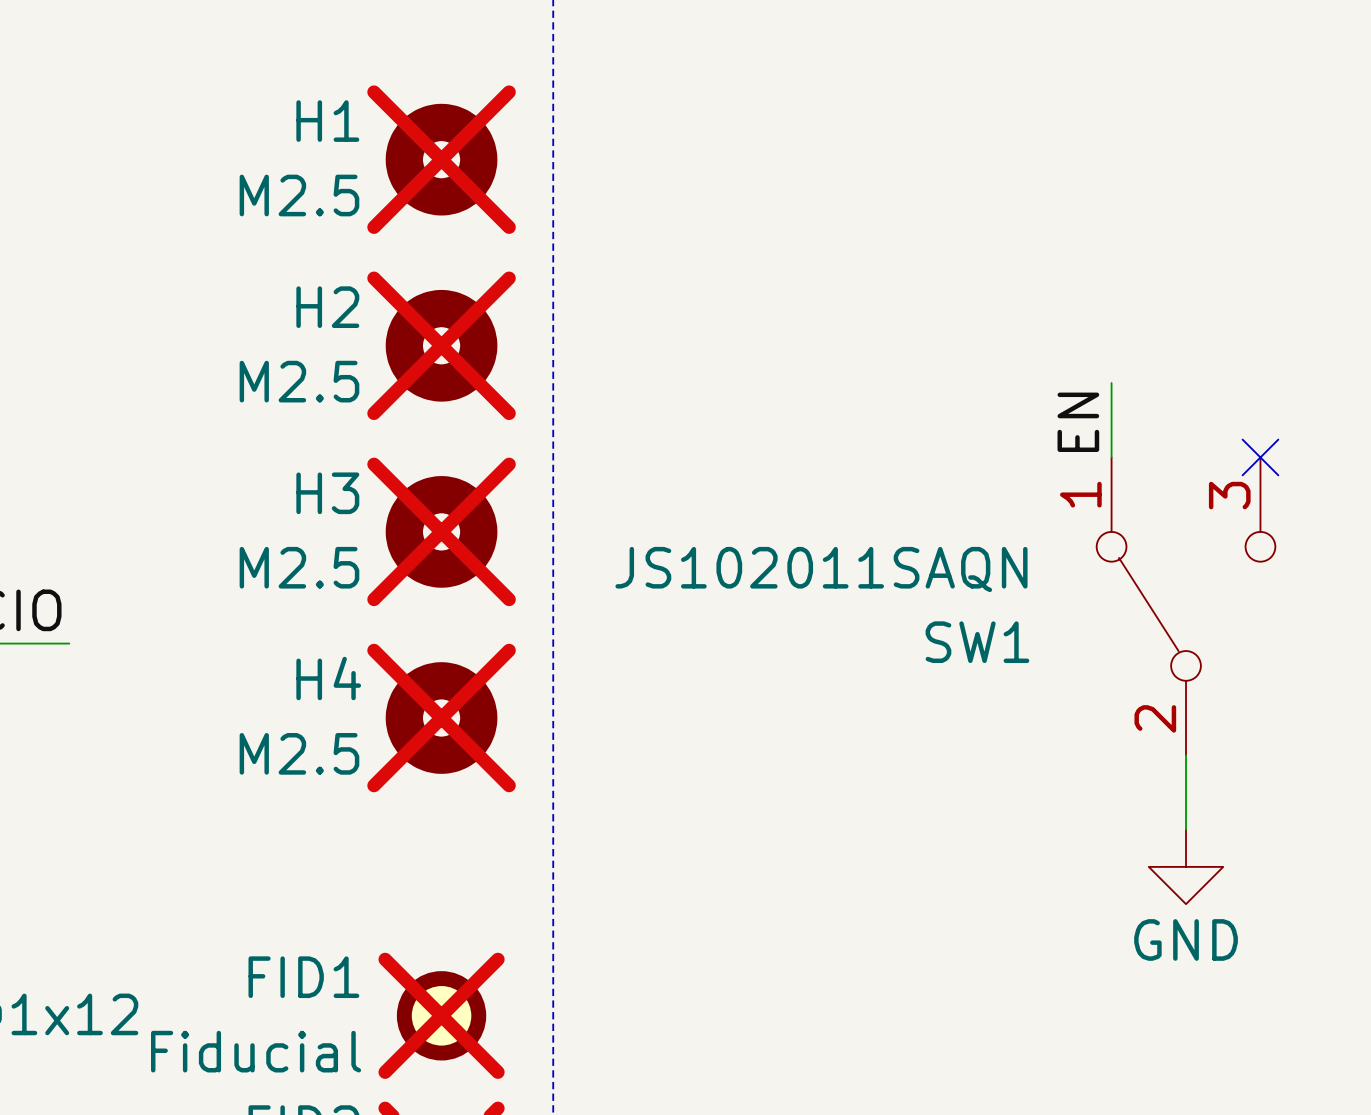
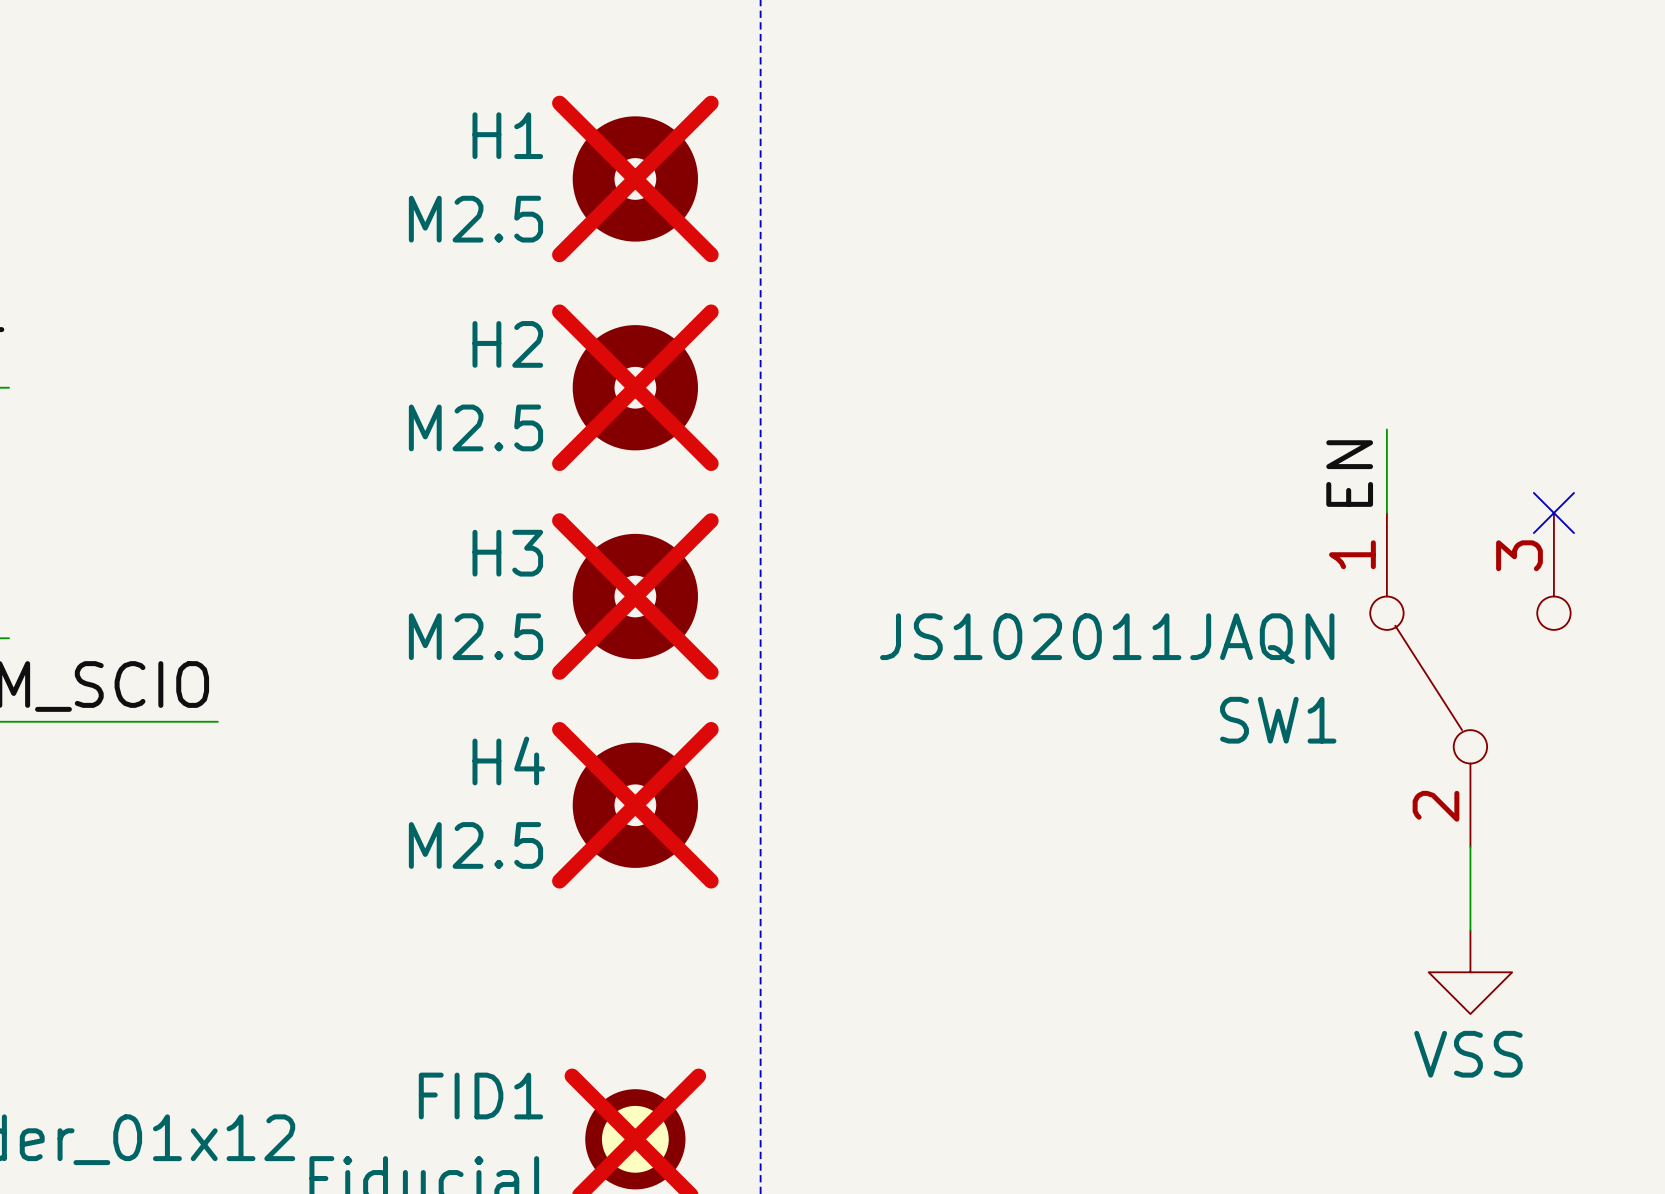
SW1 value: JS102011SAQN (821, 569) -> JS102011JAQN (1107, 638)
SW1 name position: SW1 (977, 642) -> SW1 (1278, 720)
power symbol: GND (1186, 866) -> VSS (1470, 972)

